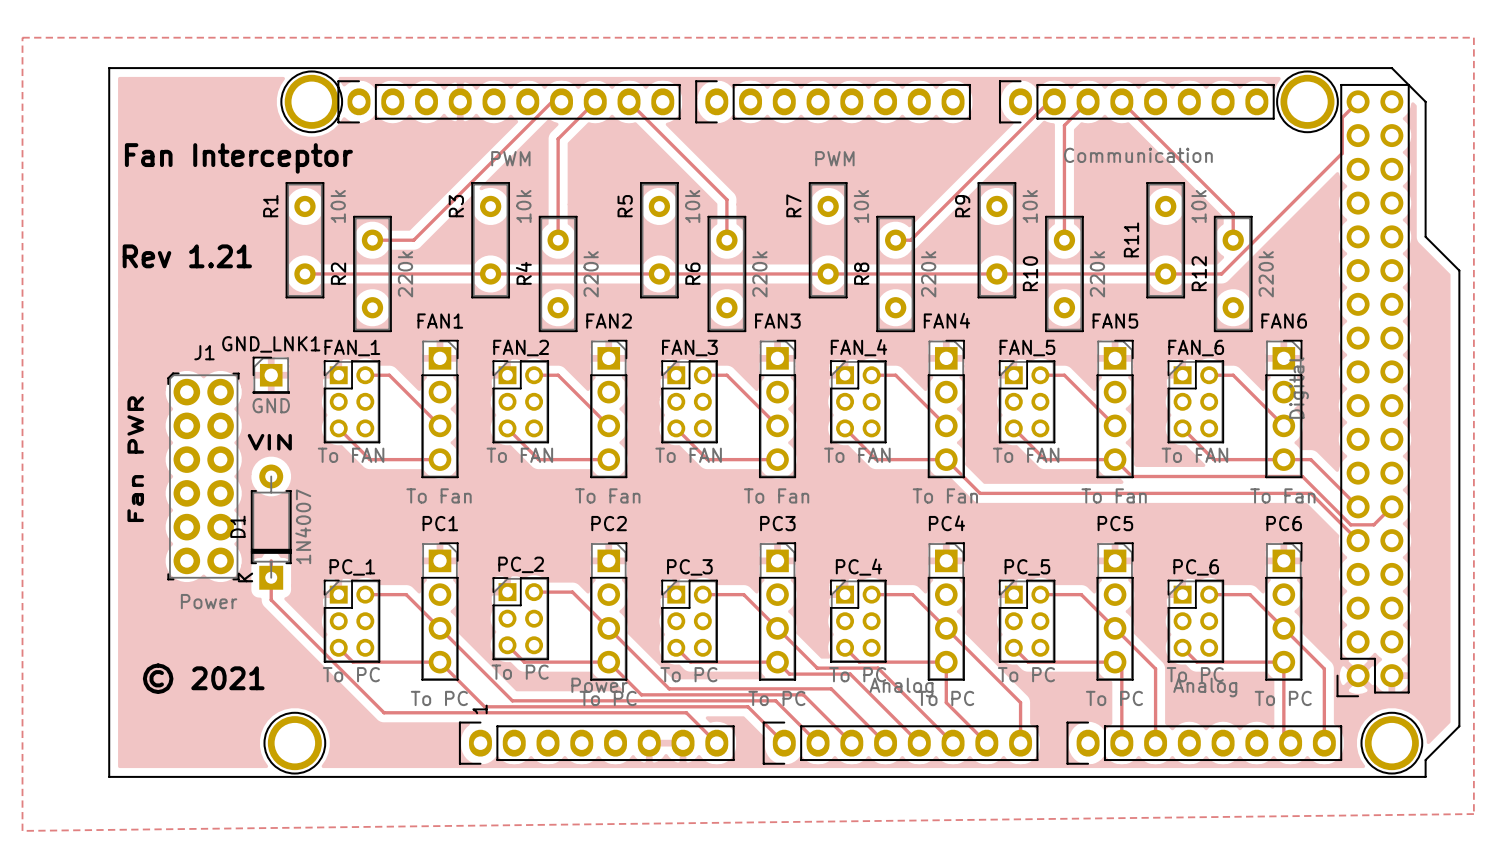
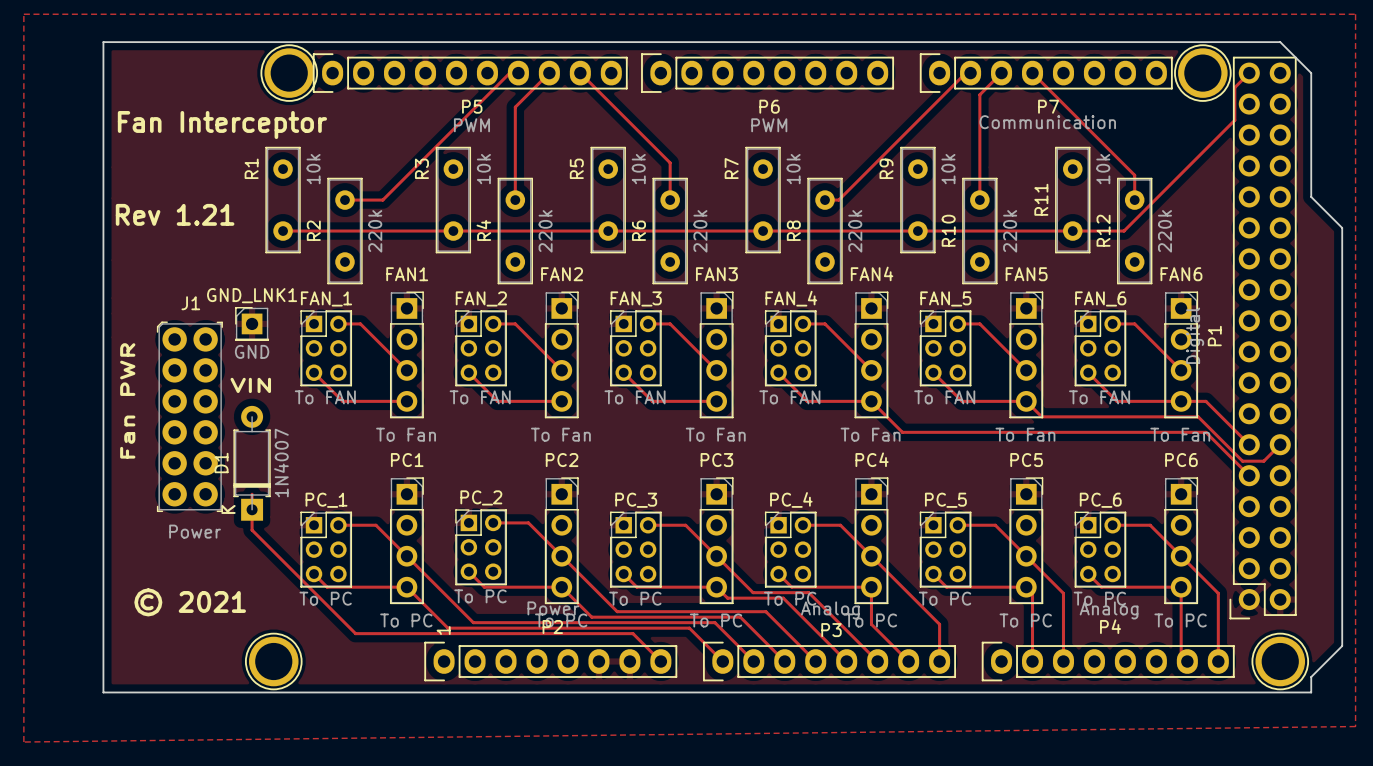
P5 name: none -> P5 (472, 106)
P6 name: none -> P6 (769, 106)
P7 name: none -> P7 (1048, 106)
P1 name: none -> P1 (1214, 336)
P2 name: none -> P2 (552, 626)
P4 name: none -> P4 (1110, 626)
P3 name: none -> P3 (831, 630)

